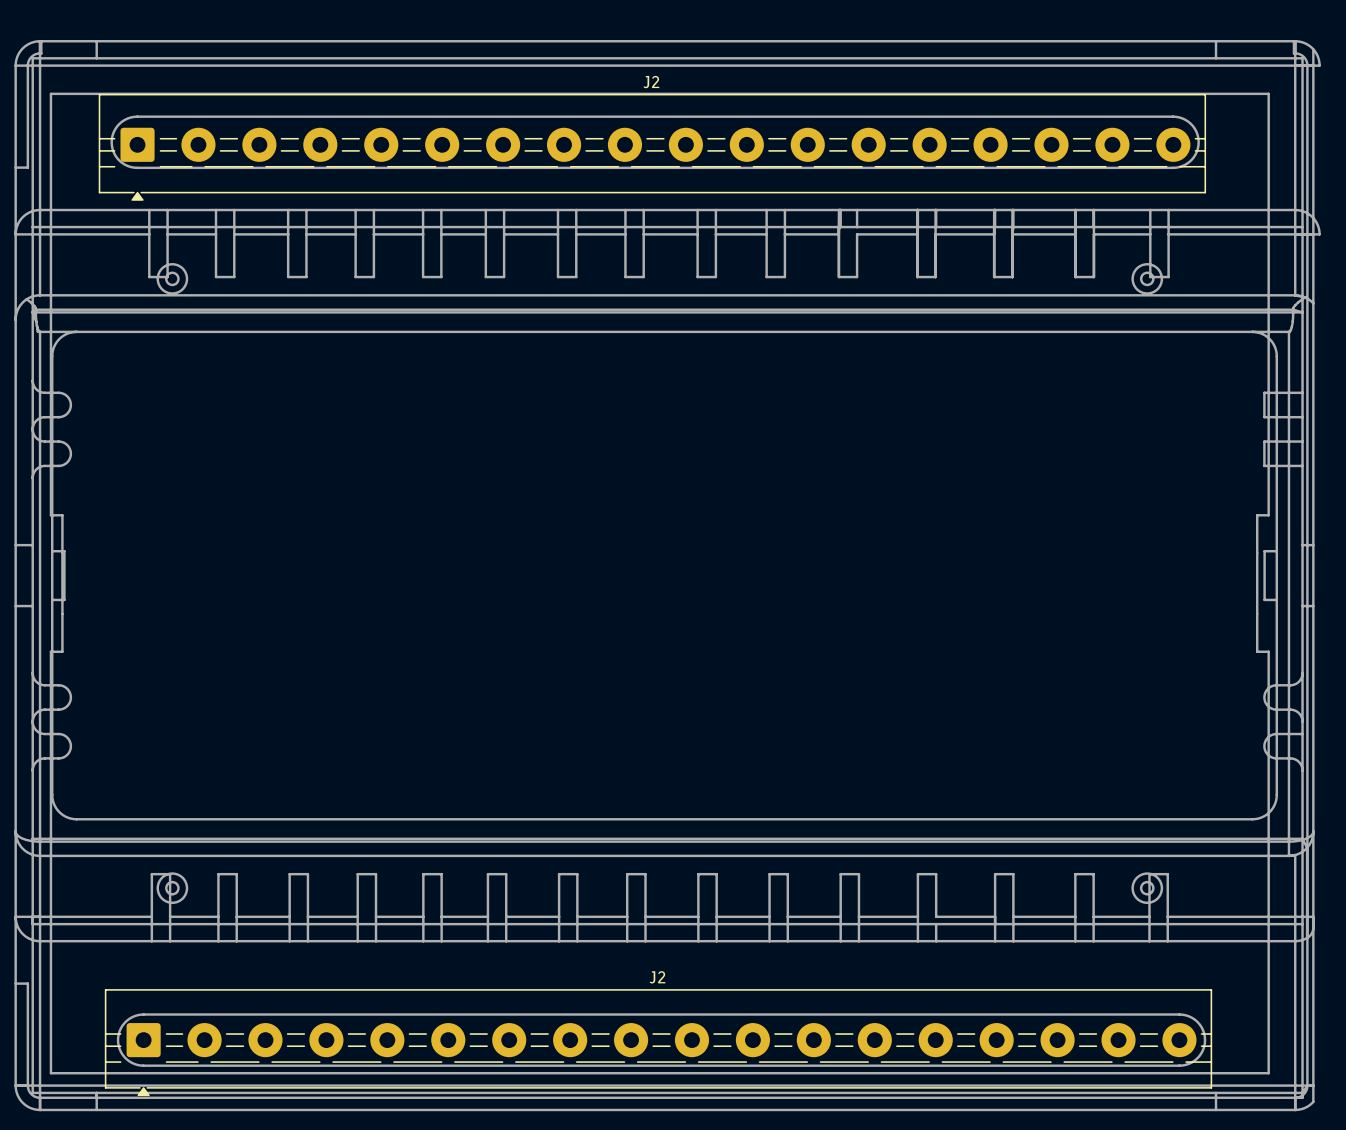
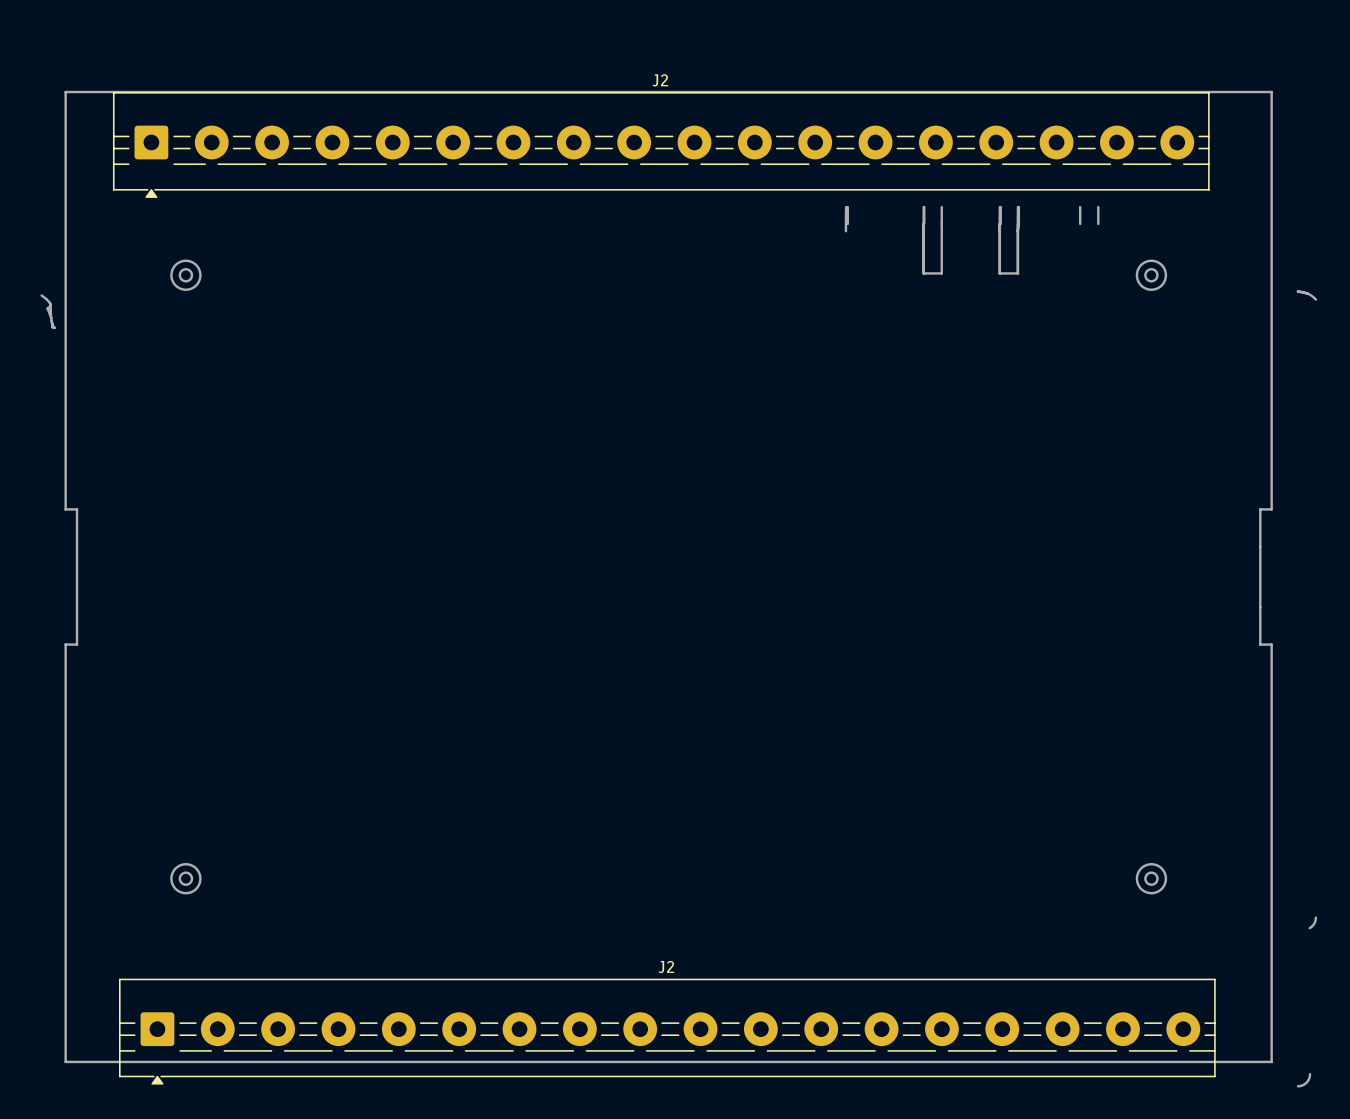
line: (40, 41) (40, 295) -> none
line: (40, 41) (1295, 41) -> none
line: (40, 41) (29, 43) (22, 48) (18, 55) (15, 65) -> none
line: (41, 41) (41, 53) (32, 56) (27, 64) (27, 167) (15, 167) -> none
line: (96, 41) (96, 58) -> none
line: (1216, 41) (1216, 58) -> none
line: (1293, 41) (1293, 53) (1303, 56) (1307, 65) (1307, 1085) (1302, 1092) (32, 1092) (32, 58) (1302, 58) (1302, 1097) (38, 1097) (31, 1094) (27, 1086) (27, 983) (15, 983) -> none
line: (1295, 41) (1295, 295) (40, 295) -> none
line: (1295, 41) (1303, 42) (1312, 48) (1318, 57) (1319, 65) (15, 65) -> none
line: (1313, 49) (1313, 1101) (1305, 1107) (1295, 1109) -> none
line: (15, 65) (15, 1085) -> none
line: (137, 116) (1173, 116) (1182, 118) (1190, 123) (1195, 130) (1198, 142) (1195, 154) (1190, 161) (1182, 166) (1173, 167) (137, 167) (127, 165) (119, 160) (113, 152) (111, 142) (113, 132) (119, 124) (127, 118) (137, 116) -> none
line: (149, 210) (149, 277) (167, 277) (167, 210) -> none
line: (216, 210) (216, 277) (234, 277) (234, 210) -> none
line: (288, 210) (288, 277) (306, 277) (306, 210) -> none
line: (355, 210) (355, 277) (373, 277) (373, 210) -> none
line: (423, 210) (423, 277) (441, 277) (441, 210) -> none
line: (485, 210) (485, 277) (504, 277) (504, 210) -> none
line: (557, 210) (557, 277) (576, 277) (576, 210) -> none
line: (625, 210) (625, 277) (643, 277) (643, 210) -> none
line: (697, 210) (697, 277) (715, 277) (715, 210) -> none
line: (766, 210) (766, 277) (784, 277) (784, 210) -> none
line: (857, 210) (857, 227) -> none
line: (1075, 210) (1075, 234) (1012, 234) -> none
line: (1093, 210) (1093, 277) (1075, 277) (1075, 227) -> none
line: (1150, 210) (1150, 277) (1168, 277) (1168, 210) -> none
line: (32, 227) (1302, 227) -> none
line: (149, 234) (15, 234) (17, 226) (22, 217) (29, 212) (40, 210) (1295, 210) (1305, 212) (1312, 217) (1318, 226) (1319, 234) (1168, 234) -> none
line: (167, 234) (216, 234) -> none
line: (234, 234) (288, 234) -> none
line: (306, 234) (355, 234) -> none
line: (373, 234) (423, 234) -> none
line: (441, 234) (485, 234) -> none
line: (504, 234) (557, 234) -> none
line: (576, 234) (625, 234) -> none
line: (643, 234) (697, 234) -> none
line: (715, 234) (766, 234) -> none
line: (784, 234) (838, 234) -> none
line: (838, 234) (839, 227) (839, 277) (857, 277) (857, 234) (917, 234) -> none
line: (994, 234) (935, 234) (935, 277) -> none
line: (1093, 234) (1150, 234) -> none
line: (40, 295) (30, 297) (22, 303) (17, 310) (15, 319) -> none
line: (1305, 297) (1296, 304) (1293, 309) -> none
line: (35, 309) (1293, 309) -> none
line: (1293, 309) (1302, 312) (32, 312) -> none
line: (1293, 309) (1292, 325) (1288, 331) -> none
line: (76, 331) (68, 333) (59, 339) (53, 348) (52, 356) (52, 794) (53, 802) (59, 812) (68, 817) (76, 819) (1252, 819) (1262, 816) (1273, 807) (1276, 794) (1276, 356) (1275, 348) (1269, 339) (1263, 334) (1252, 331) -> none
line: (1288, 331) (40, 331) (40, 1109) -> none
line: (1288, 331) (1288, 855) -> none
line: (32, 380) (34, 387) (38, 390) (63, 393) (69, 398) (70, 405) (69, 411) (64, 415) (42, 417) (34, 423) (32, 430) (36, 438) (43, 441) (63, 442) (68, 446) (70, 453) (68, 460) (63, 465) (38, 467) (34, 471) (32, 478) -> none
line: (1302, 392) (1264, 392) (1264, 417) (1302, 417) -> none
line: (1302, 441) (1264, 441) (1264, 465) (1302, 465) -> none
line: (15, 545) (32, 545) -> none
line: (1302, 545) (1313, 545) -> none
line: (52, 551) (64, 551) (64, 599) (52, 599) -> none
line: (1276, 551) (1264, 551) (1264, 599) (1276, 599) -> none
line: (15, 606) (32, 606) -> none
line: (1302, 606) (1313, 606) -> none
line: (32, 673) (33, 678) (38, 683) (63, 686) (68, 690) (70, 697) (68, 704) (63, 708) (43, 709) (36, 712) (33, 718) (34, 727) (42, 733) (64, 735) (68, 739) (70, 746) (68, 753) (63, 757) (38, 760) (33, 765) (32, 770) -> none
line: (1302, 673) (1301, 678) (1296, 683) (1271, 686) (1266, 691) (1264, 697) (1266, 703) (1271, 708) (1296, 711) (1301, 716) (1302, 721) -> none
line: (1302, 734) (1272, 734) (1266, 739) (1264, 746) (1266, 753) (1272, 757) (1296, 760) (1301, 765) (1302, 770) -> none
line: (32, 838) (1302, 838) (1307, 847) (1307, 938) (1295, 941) (40, 941) (29, 938) (22, 934) (17, 924) (15, 916) (151, 916) -> none
line: (1288, 855) (1295, 855) (1295, 1109) -> none
line: (1288, 855) (40, 855) (31, 854) (22, 848) (18, 842) (16, 836) (15, 831) (22, 838) (40, 841) (1288, 841) (1306, 838) (1313, 831) (1310, 842) (1306, 848) (1299, 853) (1288, 855) -> none
line: (170, 916) (218, 916) -> none
line: (236, 916) (289, 916) -> none
line: (307, 916) (357, 916) -> none
line: (376, 916) (423, 916) -> none
line: (441, 916) (487, 916) -> none
line: (506, 916) (559, 916) -> none
line: (577, 916) (627, 916) -> none
line: (645, 916) (698, 916) -> none
line: (716, 916) (769, 916) -> none
line: (787, 916) (840, 916) -> none
line: (858, 916) (917, 916) -> none
line: (995, 916) (936, 916) (936, 874) (917, 874) (917, 941) -> none
line: (1013, 916) (1075, 916) -> none
line: (1093, 916) (1149, 916) -> none
line: (1167, 916) (1313, 916) -> none
line: (32, 924) (1302, 924) -> none
line: (936, 924) (936, 941) -> none
line: (151, 941) (151, 874) (170, 874) (170, 941) -> none
line: (218, 941) (218, 874) (236, 874) (236, 941) -> none
line: (289, 941) (289, 874) (307, 874) (307, 941) -> none
line: (357, 941) (357, 874) (376, 874) (376, 941) -> none
line: (423, 941) (423, 874) (441, 874) (441, 941) -> none
line: (487, 941) (487, 874) (506, 874) (506, 941) -> none
line: (559, 941) (559, 874) (577, 874) (577, 941) -> none
line: (627, 941) (627, 874) (645, 874) (645, 941) -> none
line: (698, 941) (698, 874) (716, 874) (716, 941) -> none
line: (769, 941) (769, 874) (787, 874) (787, 941) -> none
line: (840, 941) (840, 874) (858, 874) (858, 941) -> none
line: (995, 941) (995, 874) (1013, 874) (1013, 941) -> none
line: (1075, 941) (1075, 874) (1093, 874) (1093, 941) -> none
line: (1149, 941) (1149, 874) (1167, 874) (1167, 941) -> none
line: (143, 1014) (1179, 1014) (1189, 1016) (1197, 1022) (1203, 1030) (1205, 1040) (1203, 1049) (1197, 1058) (1189, 1063) (1179, 1065) (143, 1065) (134, 1064) (126, 1059) (119, 1049) (118, 1040) (120, 1028) (126, 1020) (134, 1016) (143, 1014) -> none
line: (15, 1085) (1313, 1085) -> none
line: (15, 1085) (17, 1093) (22, 1102) (31, 1108) (40, 1109) -> none
line: (96, 1092) (96, 1109) -> none
line: (1216, 1092) (1216, 1109) -> none
line: (40, 1109) (1295, 1109) -> none

